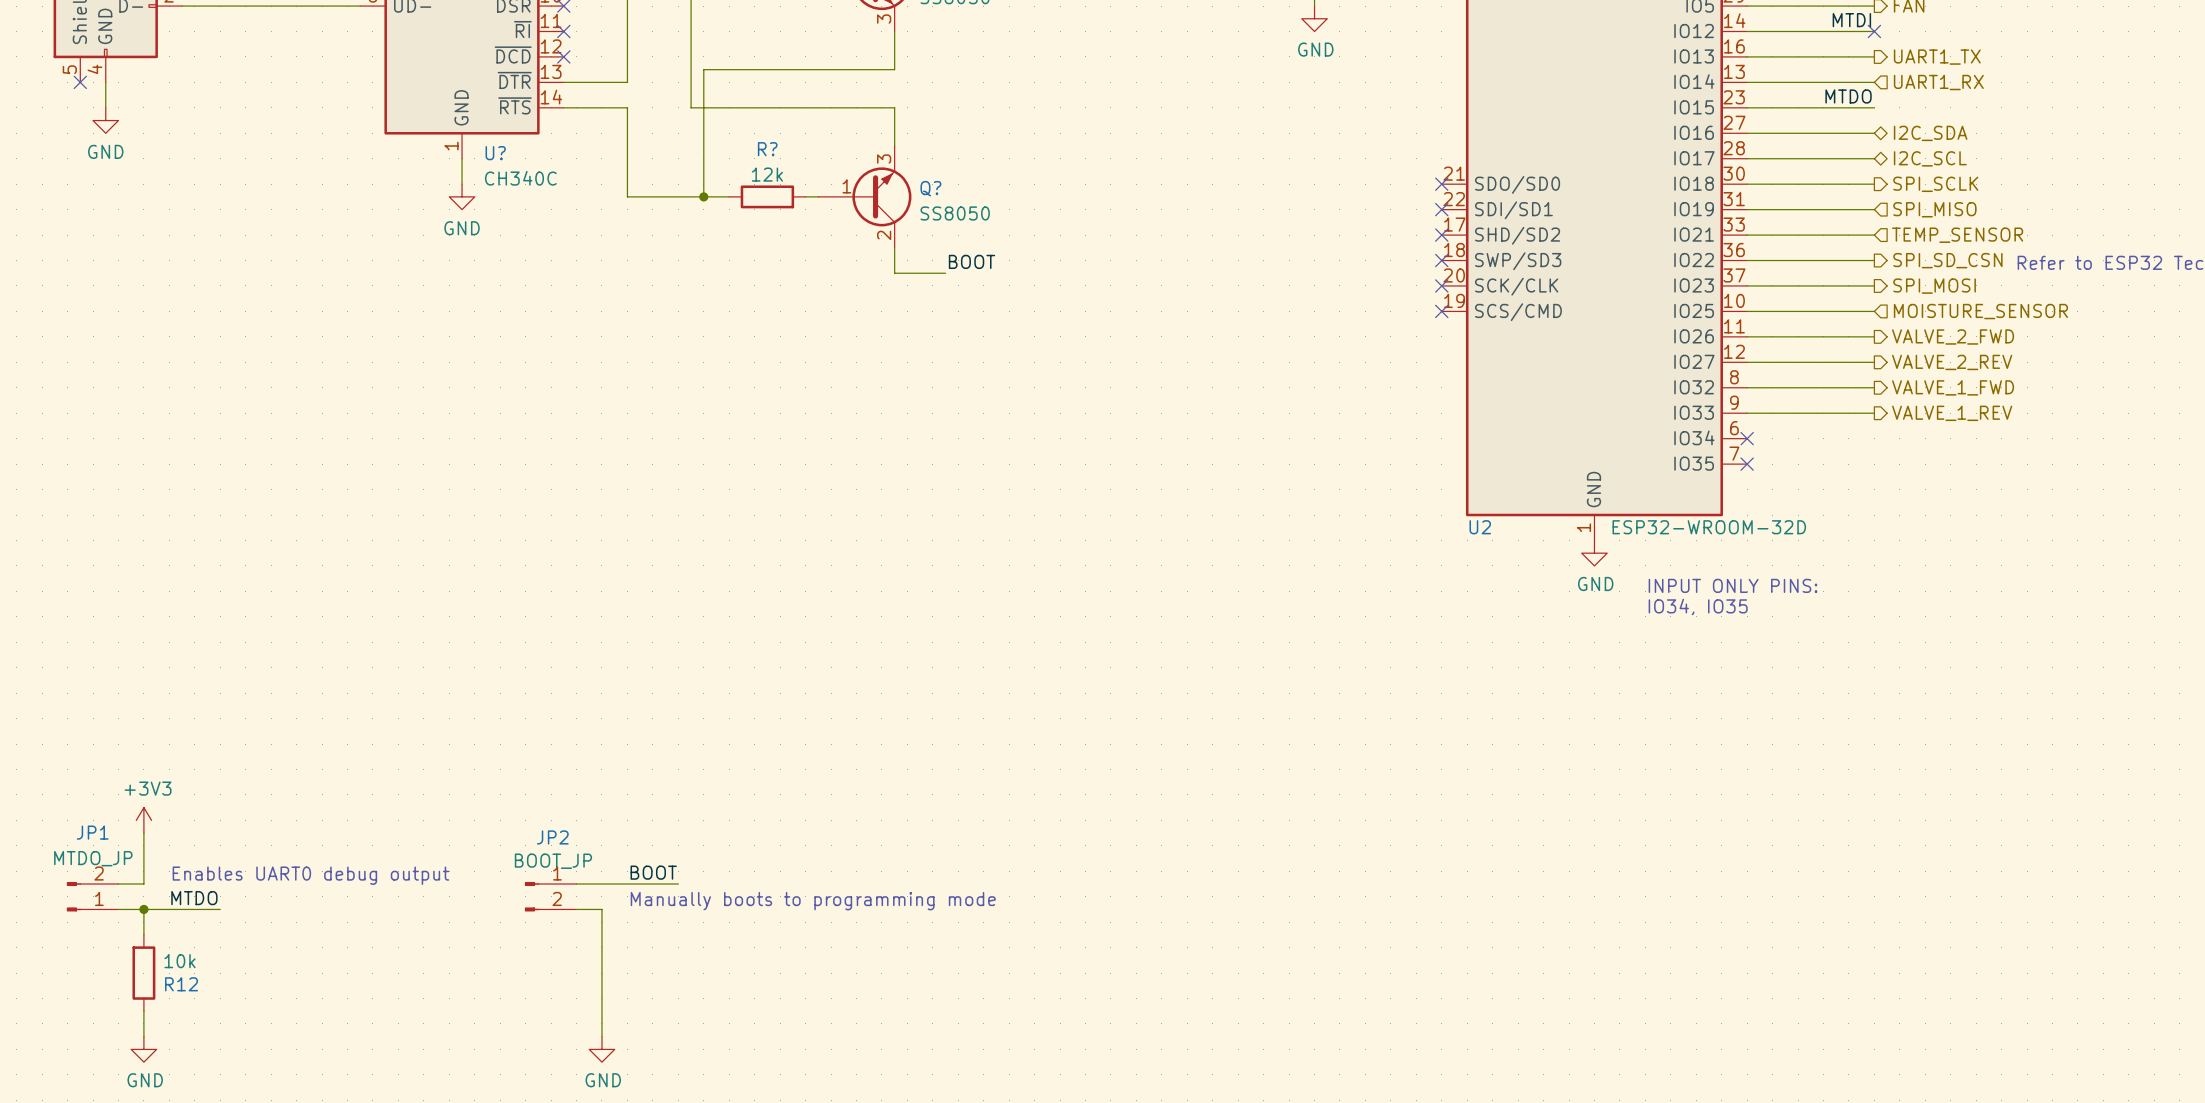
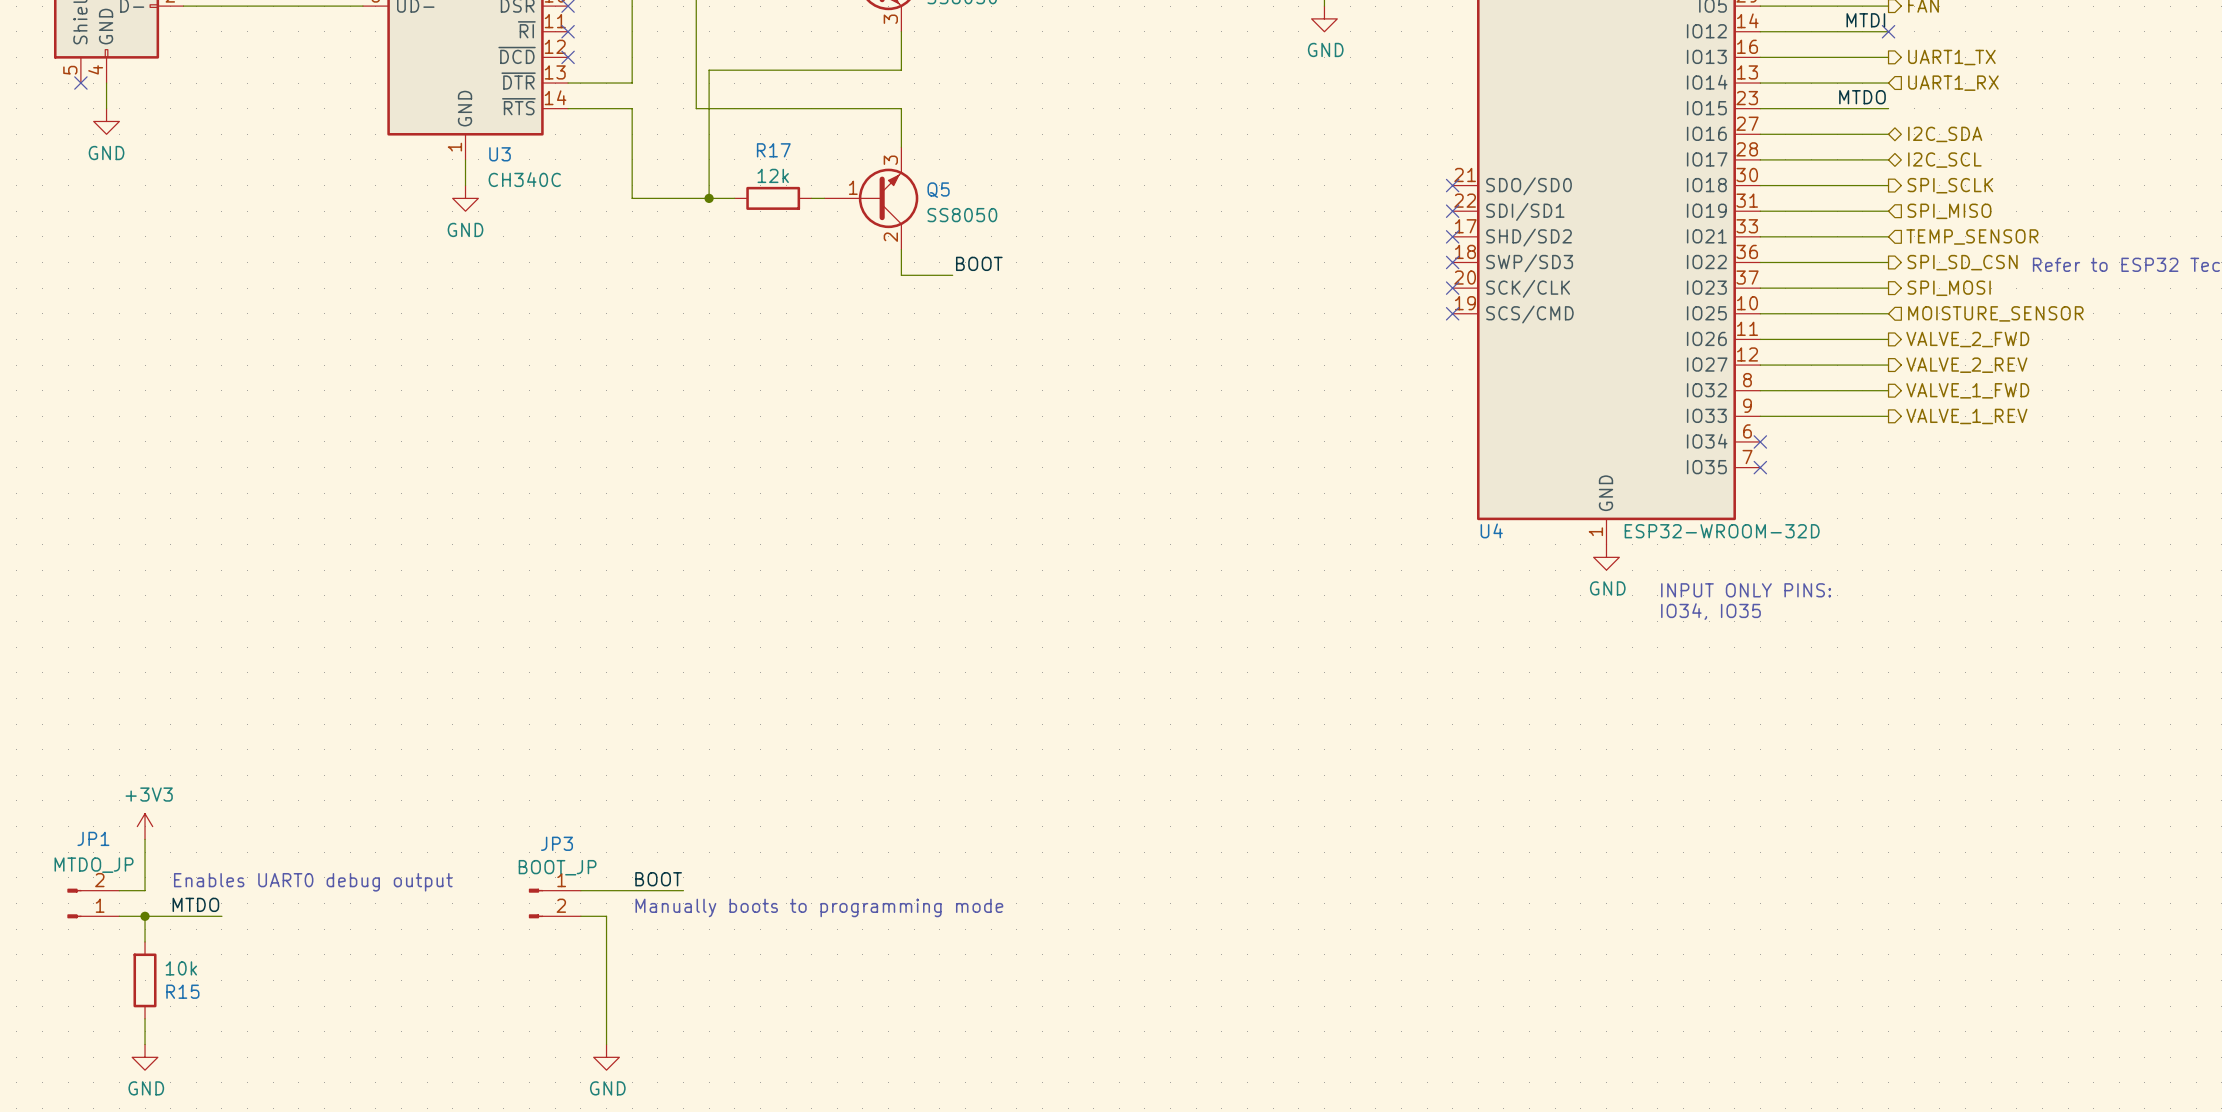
R? name: R? (767, 149) -> R17 (773, 150)
U? name: U? (495, 153) -> U3 (500, 154)
Q? name: Q? (930, 188) -> Q5 (938, 190)
U2 name: U2 (1480, 527) -> U4 (1491, 530)
JP2 name: JP2 (552, 837) -> JP3 (556, 843)
R12 name: R12 (181, 984) -> R15 (182, 991)

